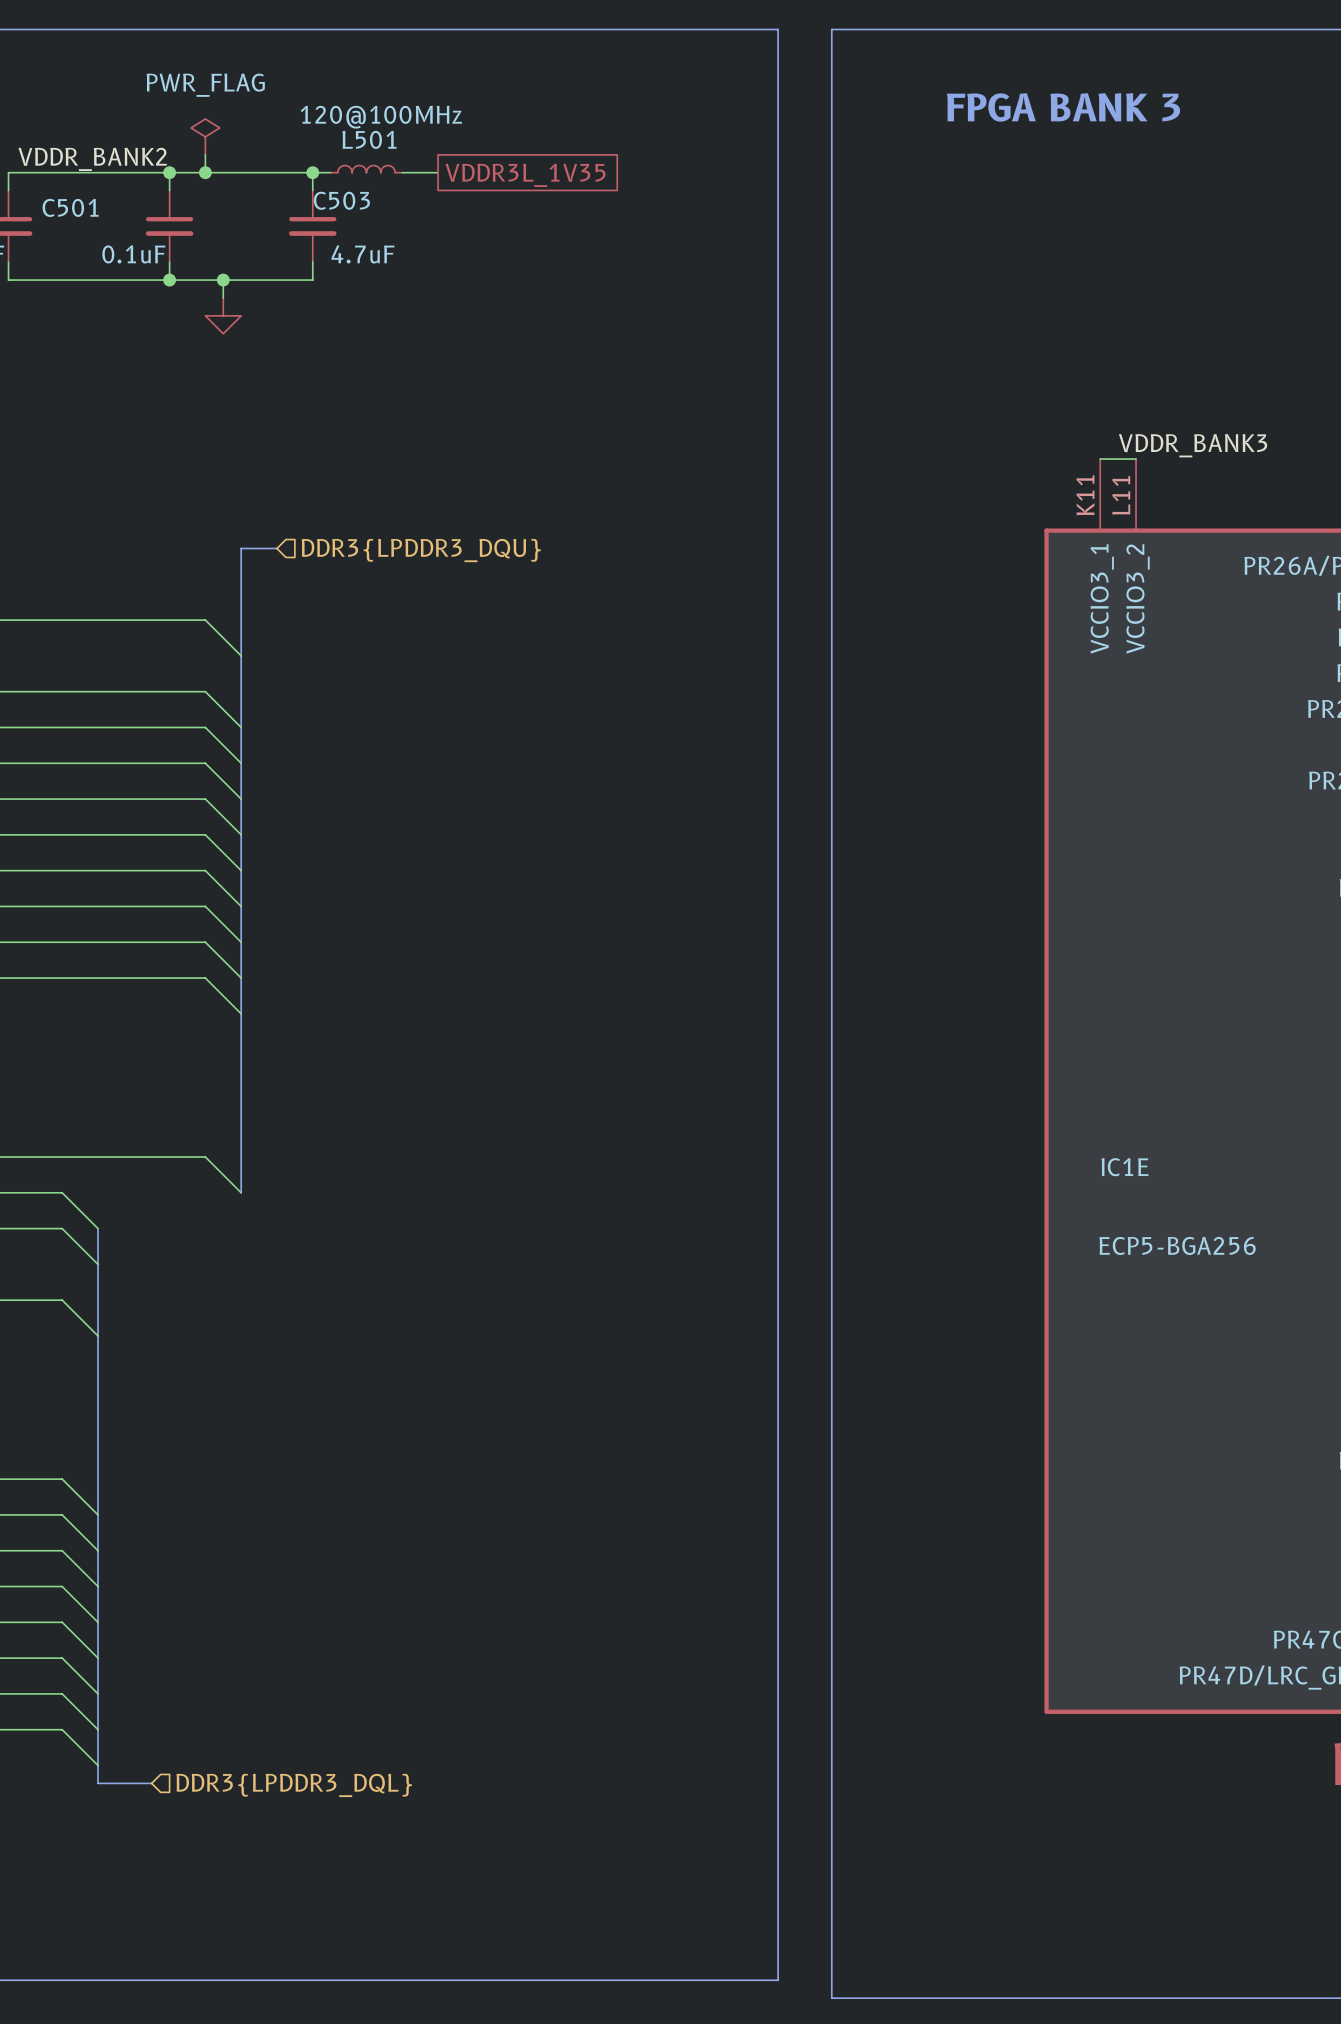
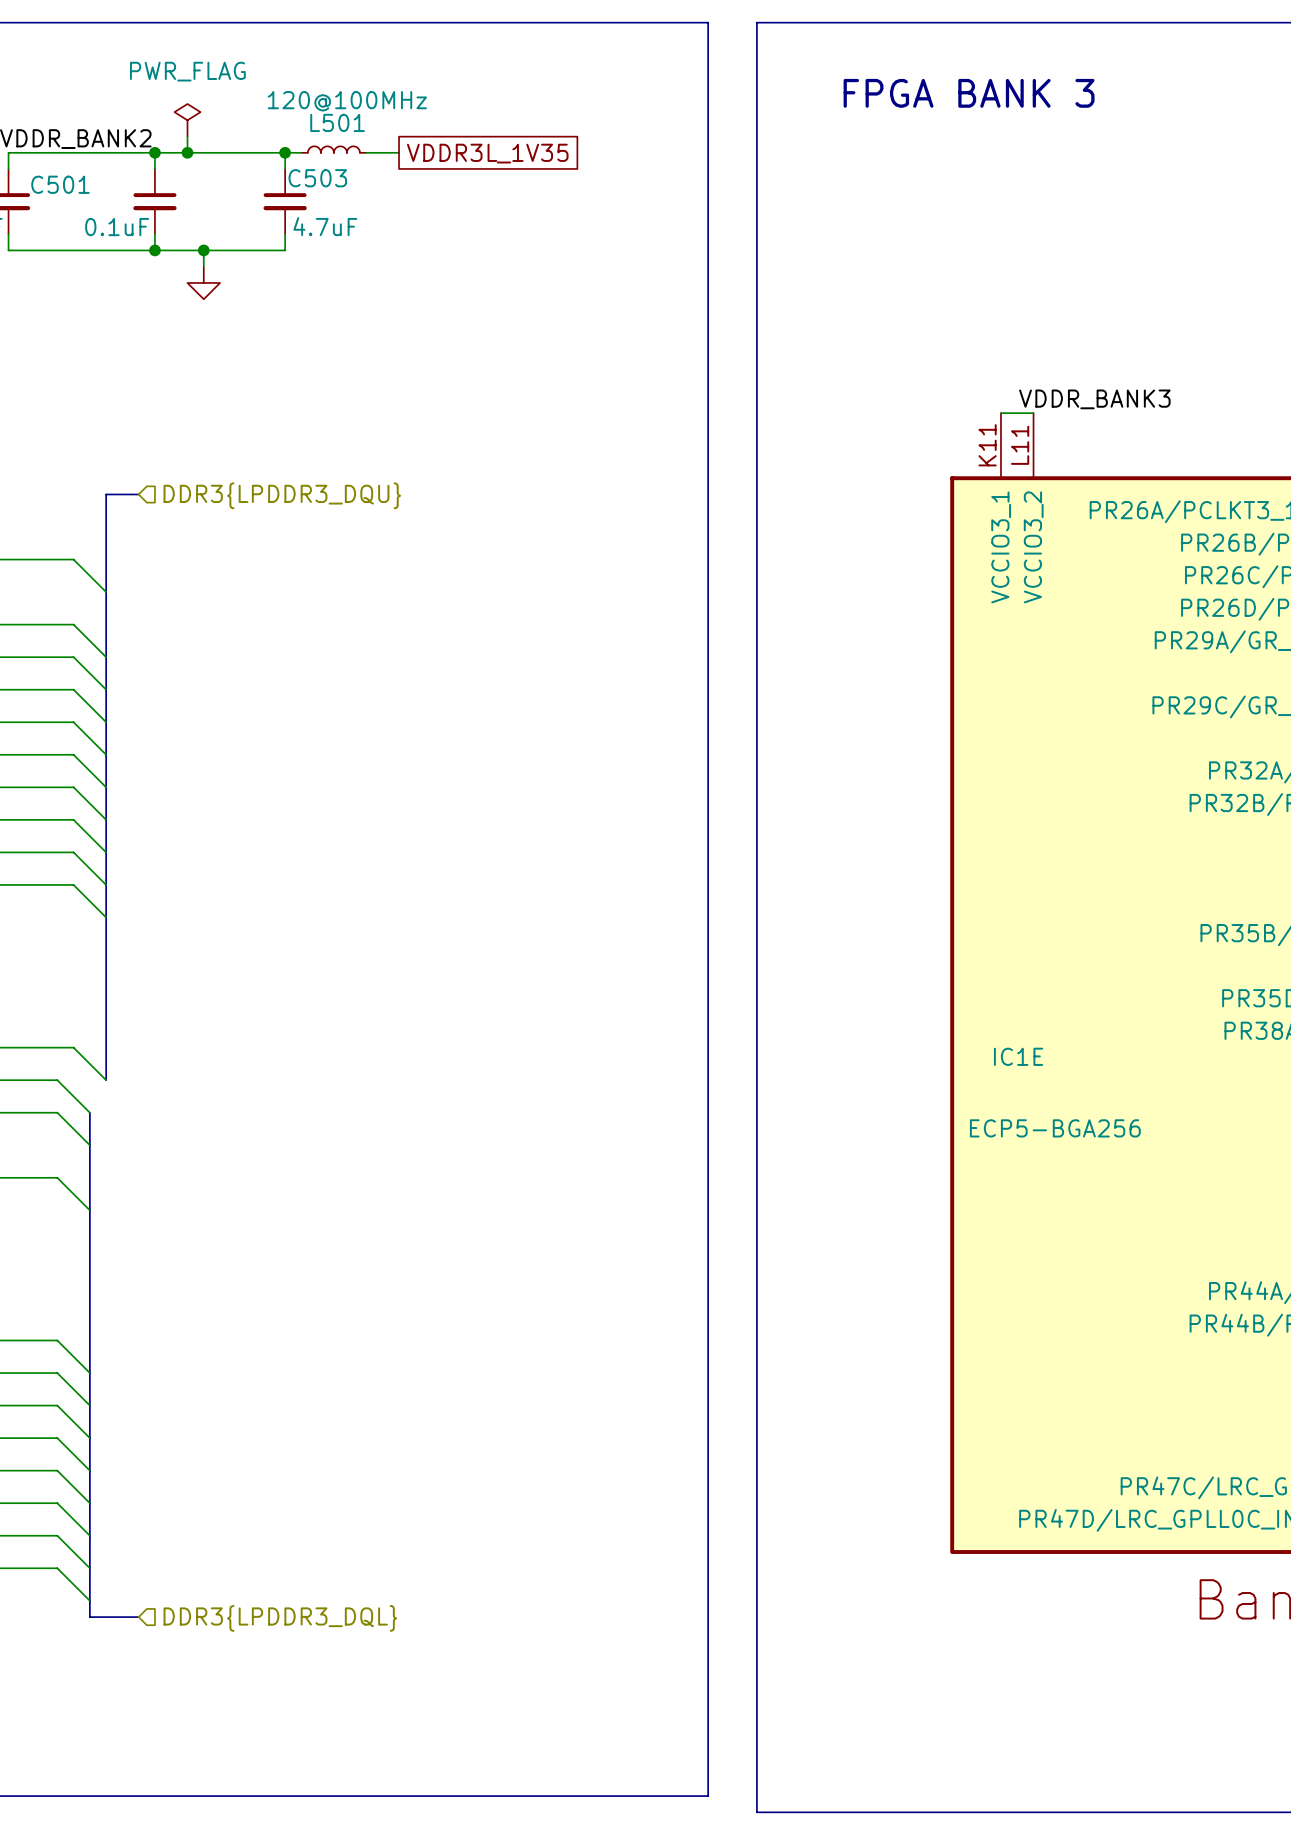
bus: (276, 548) (241, 548) (241, 1192) -> (138, 494) (106, 494) (106, 1080)
hierarchical label position: DDR3{LPDDR3_DQU} (421, 550) -> DDR3{LPDDR3_DQU} (282, 495)
wire: (80, 620) (205, 620) (241, 655) -> (73, 559) (106, 592)
wire: (80, 691) (205, 691) (241, 727) -> (73, 624) (106, 657)
wire: (80, 727) (205, 727) (241, 763) -> (73, 657) (106, 689)
wire: (80, 763) (205, 763) (241, 799) -> (73, 689) (106, 722)
wire: (80, 799) (205, 799) (241, 834) -> (73, 722) (106, 754)
wire: (80, 834) (205, 834) (241, 870) -> (73, 754) (106, 787)
wire: (80, 870) (205, 870) (241, 906) -> (73, 787) (106, 819)
wire: (80, 906) (205, 906) (241, 942) -> (73, 819) (106, 852)
wire: (80, 942) (205, 942) (241, 978) -> (73, 852) (106, 884)
wire: (80, 978) (205, 978) (241, 1013) -> (73, 884) (106, 917)
wire: (80, 1157) (205, 1157) (241, 1192) -> (73, 1047) (106, 1080)

